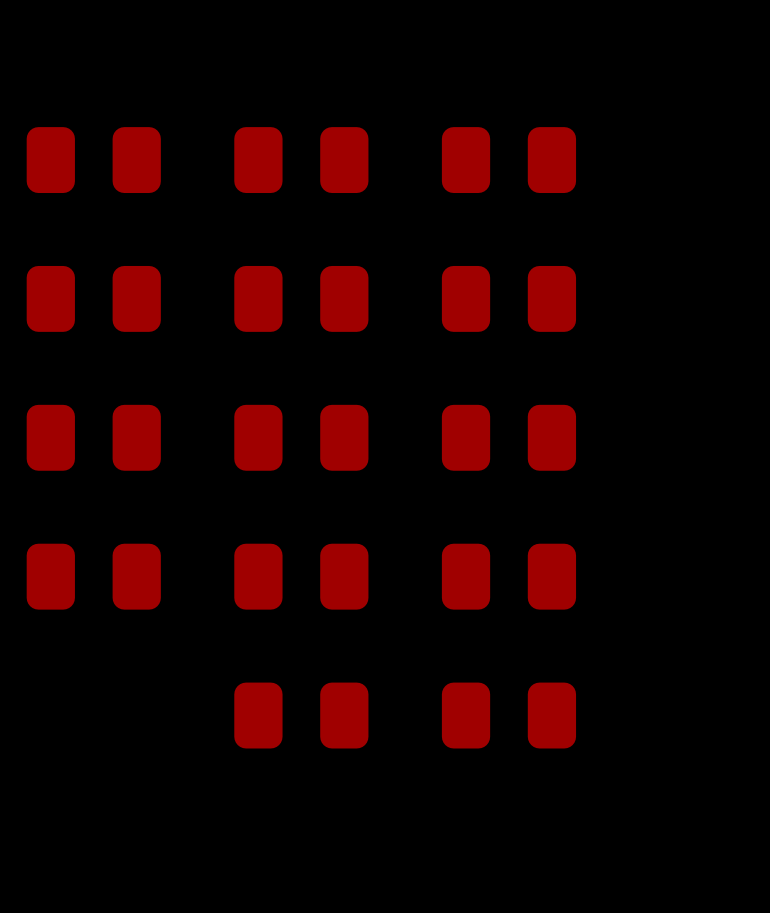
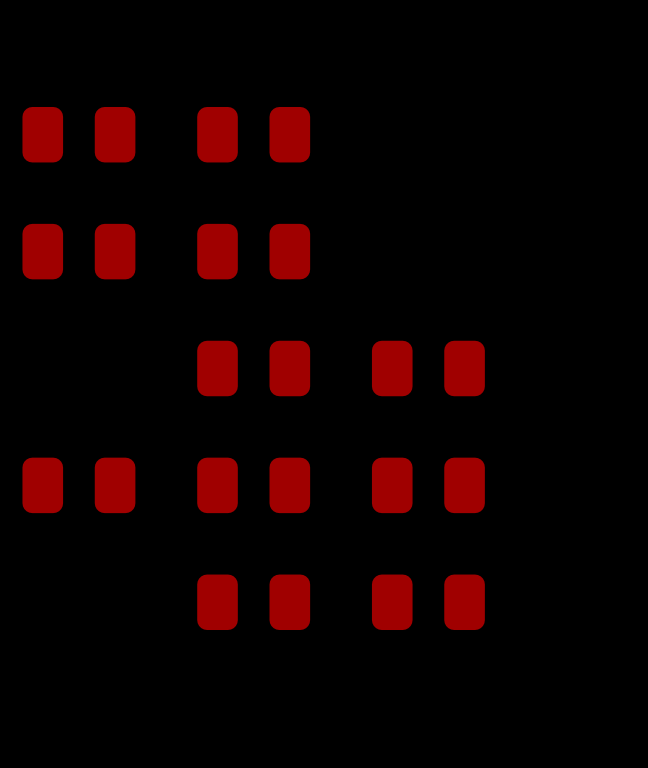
part: (508, 160) -> none
part: (508, 298) -> none
part: (93, 437) -> none

